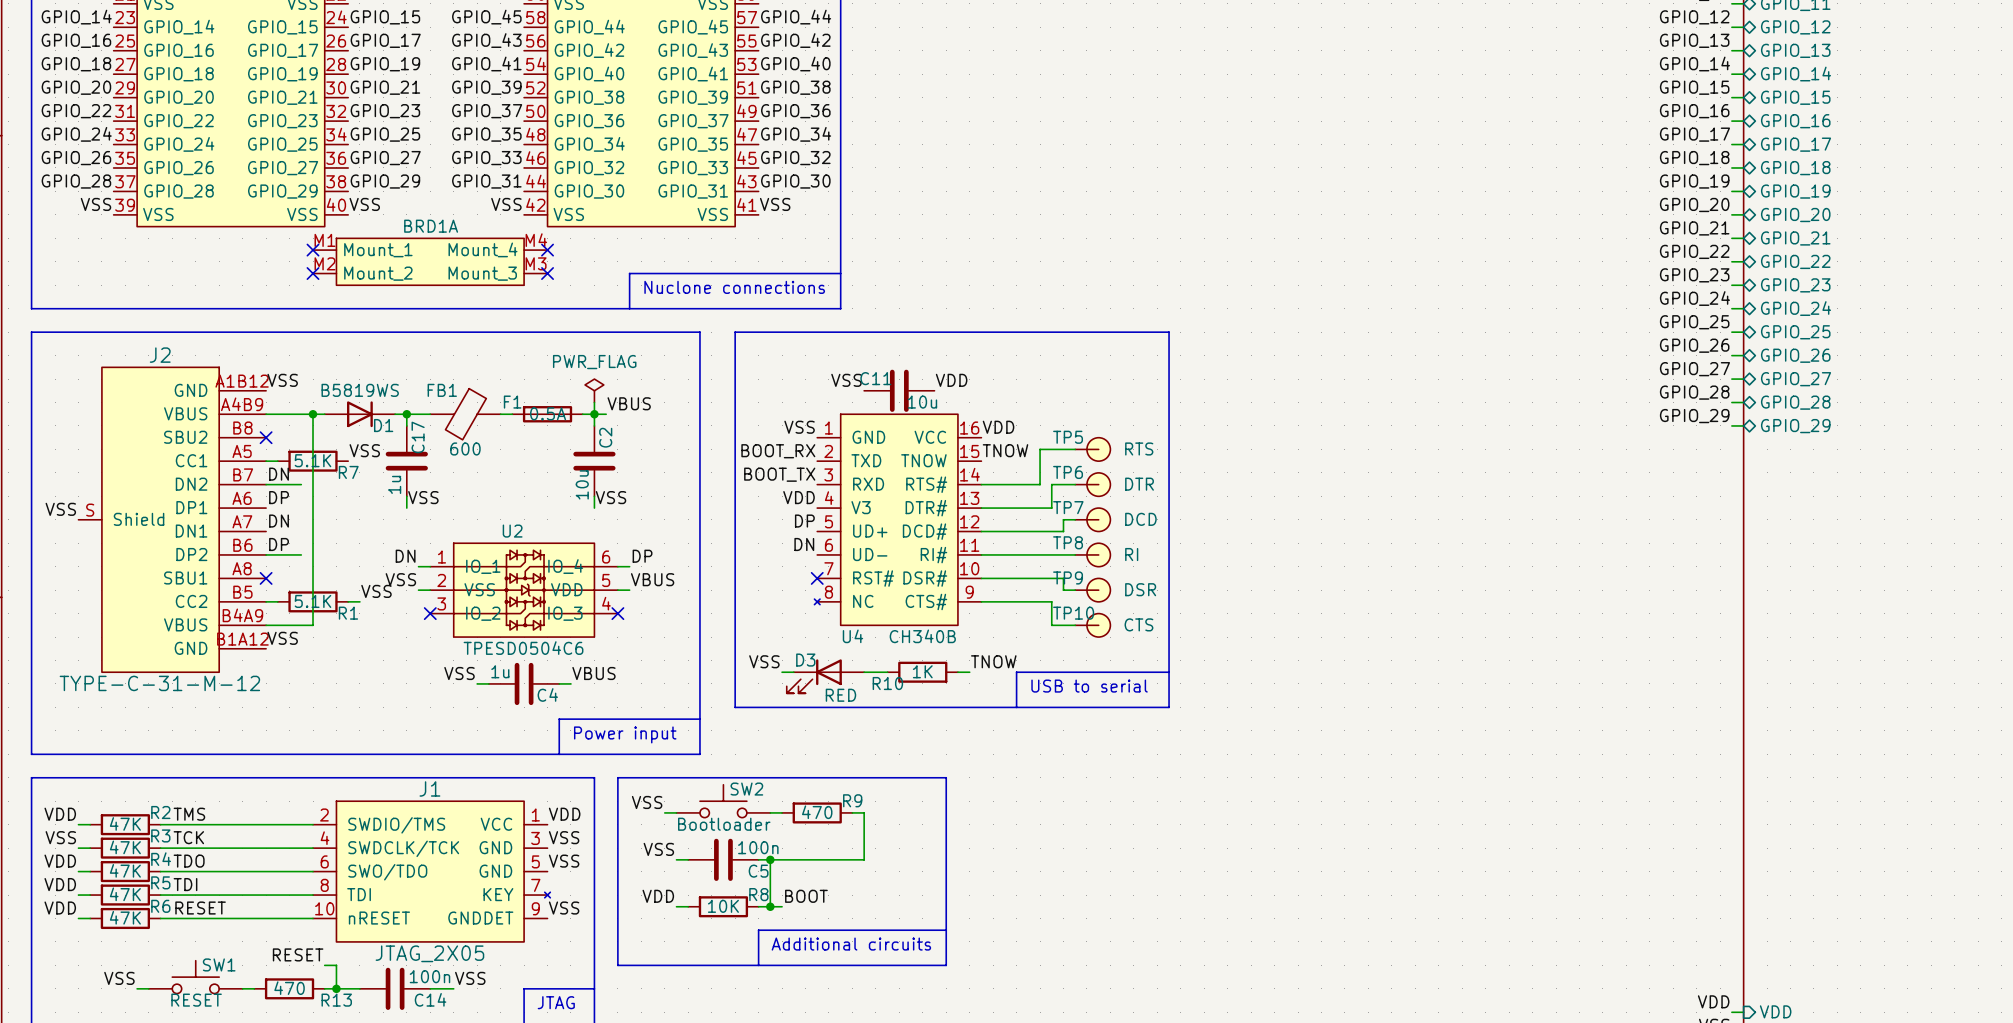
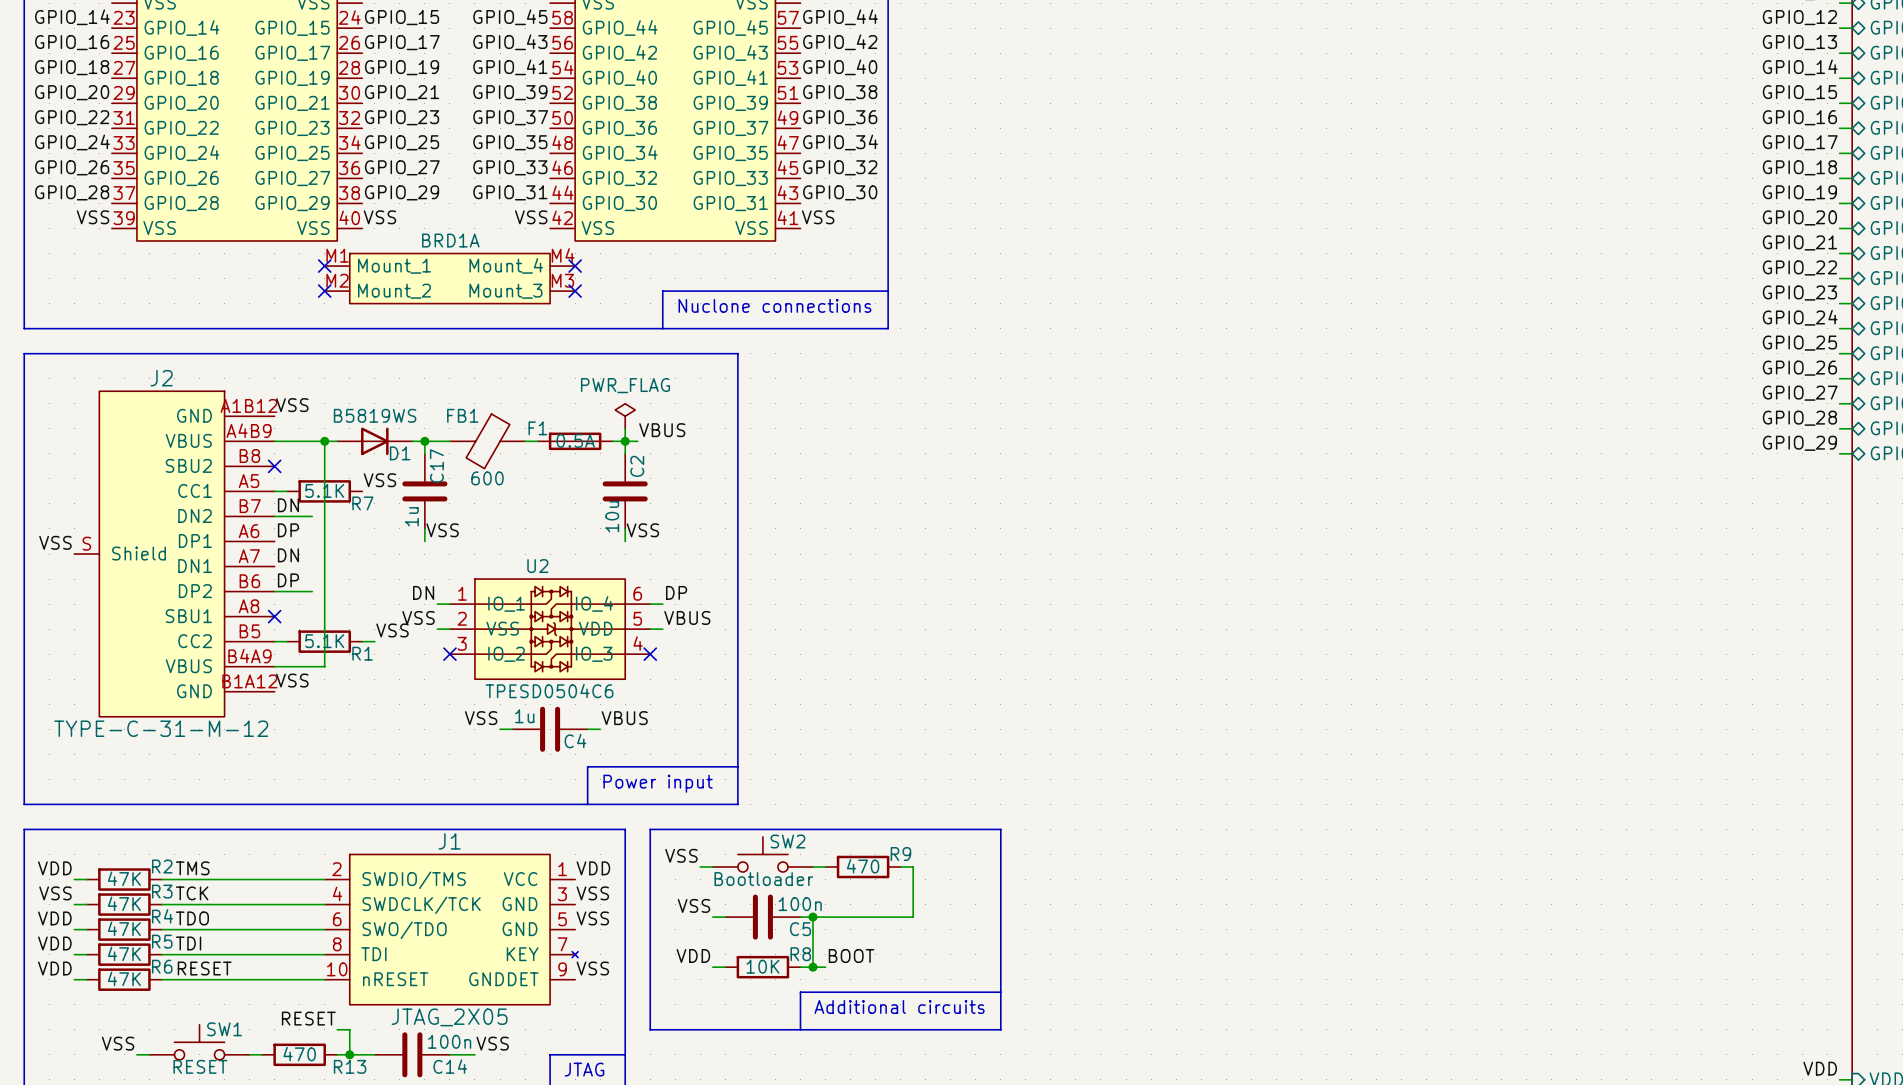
line: (735, 332) (735, 707) (1169, 707) (1169, 332) (735, 332) -> none
label: VSS (846, 380) -> none
label: VDD (951, 380) -> none
C11: 10u (899, 390) -> none
label: VSS (799, 427) -> none
label: VDD (998, 427) -> none
wire: (1075, 449) (1040, 449) (1040, 484) (981, 484) -> none
TP5: RTS (1092, 449) -> none
label: TNOW (1005, 450) -> none
label: BOOT_RX (778, 451) -> none
label: BOOT_TX (779, 474) -> none
wire: (1075, 484) (1051, 484) (1051, 508) (981, 508) -> none
TP6: DTR (1092, 484) -> none
label: VDD (799, 497) -> none
U4: CH340B (897, 519) -> none
wire: (1075, 519) (1063, 519) (1063, 531) (981, 531) -> none
TP7: DCD (1092, 519) -> none
label: DP (804, 521) -> none
label: DN (804, 544) -> none
wire: (981, 554) (1075, 554) -> none
TP8: RI (1092, 554) -> none
no-connect mark: (817, 578) -> none
wire: (981, 578) (1063, 578) (1063, 590) (1075, 590) -> none
TP9: DSR (1092, 590) -> none
wire: (981, 601) (1051, 601) (1051, 625) (1075, 625) -> none
TP10: CTS (1092, 625) -> none
label: VSS (764, 661) -> none
label: TNOW (993, 661) -> none
wire: (782, 672) (793, 672) -> none
wire: (864, 672) (887, 672) -> none
R10: 1K (922, 672) -> none
wire: (957, 672) (969, 672) -> none
line: (1169, 672) (1016, 672) (1016, 707) -> none
D3: RED (825, 676) -> none
text: USB to serial (1089, 686) -> none

